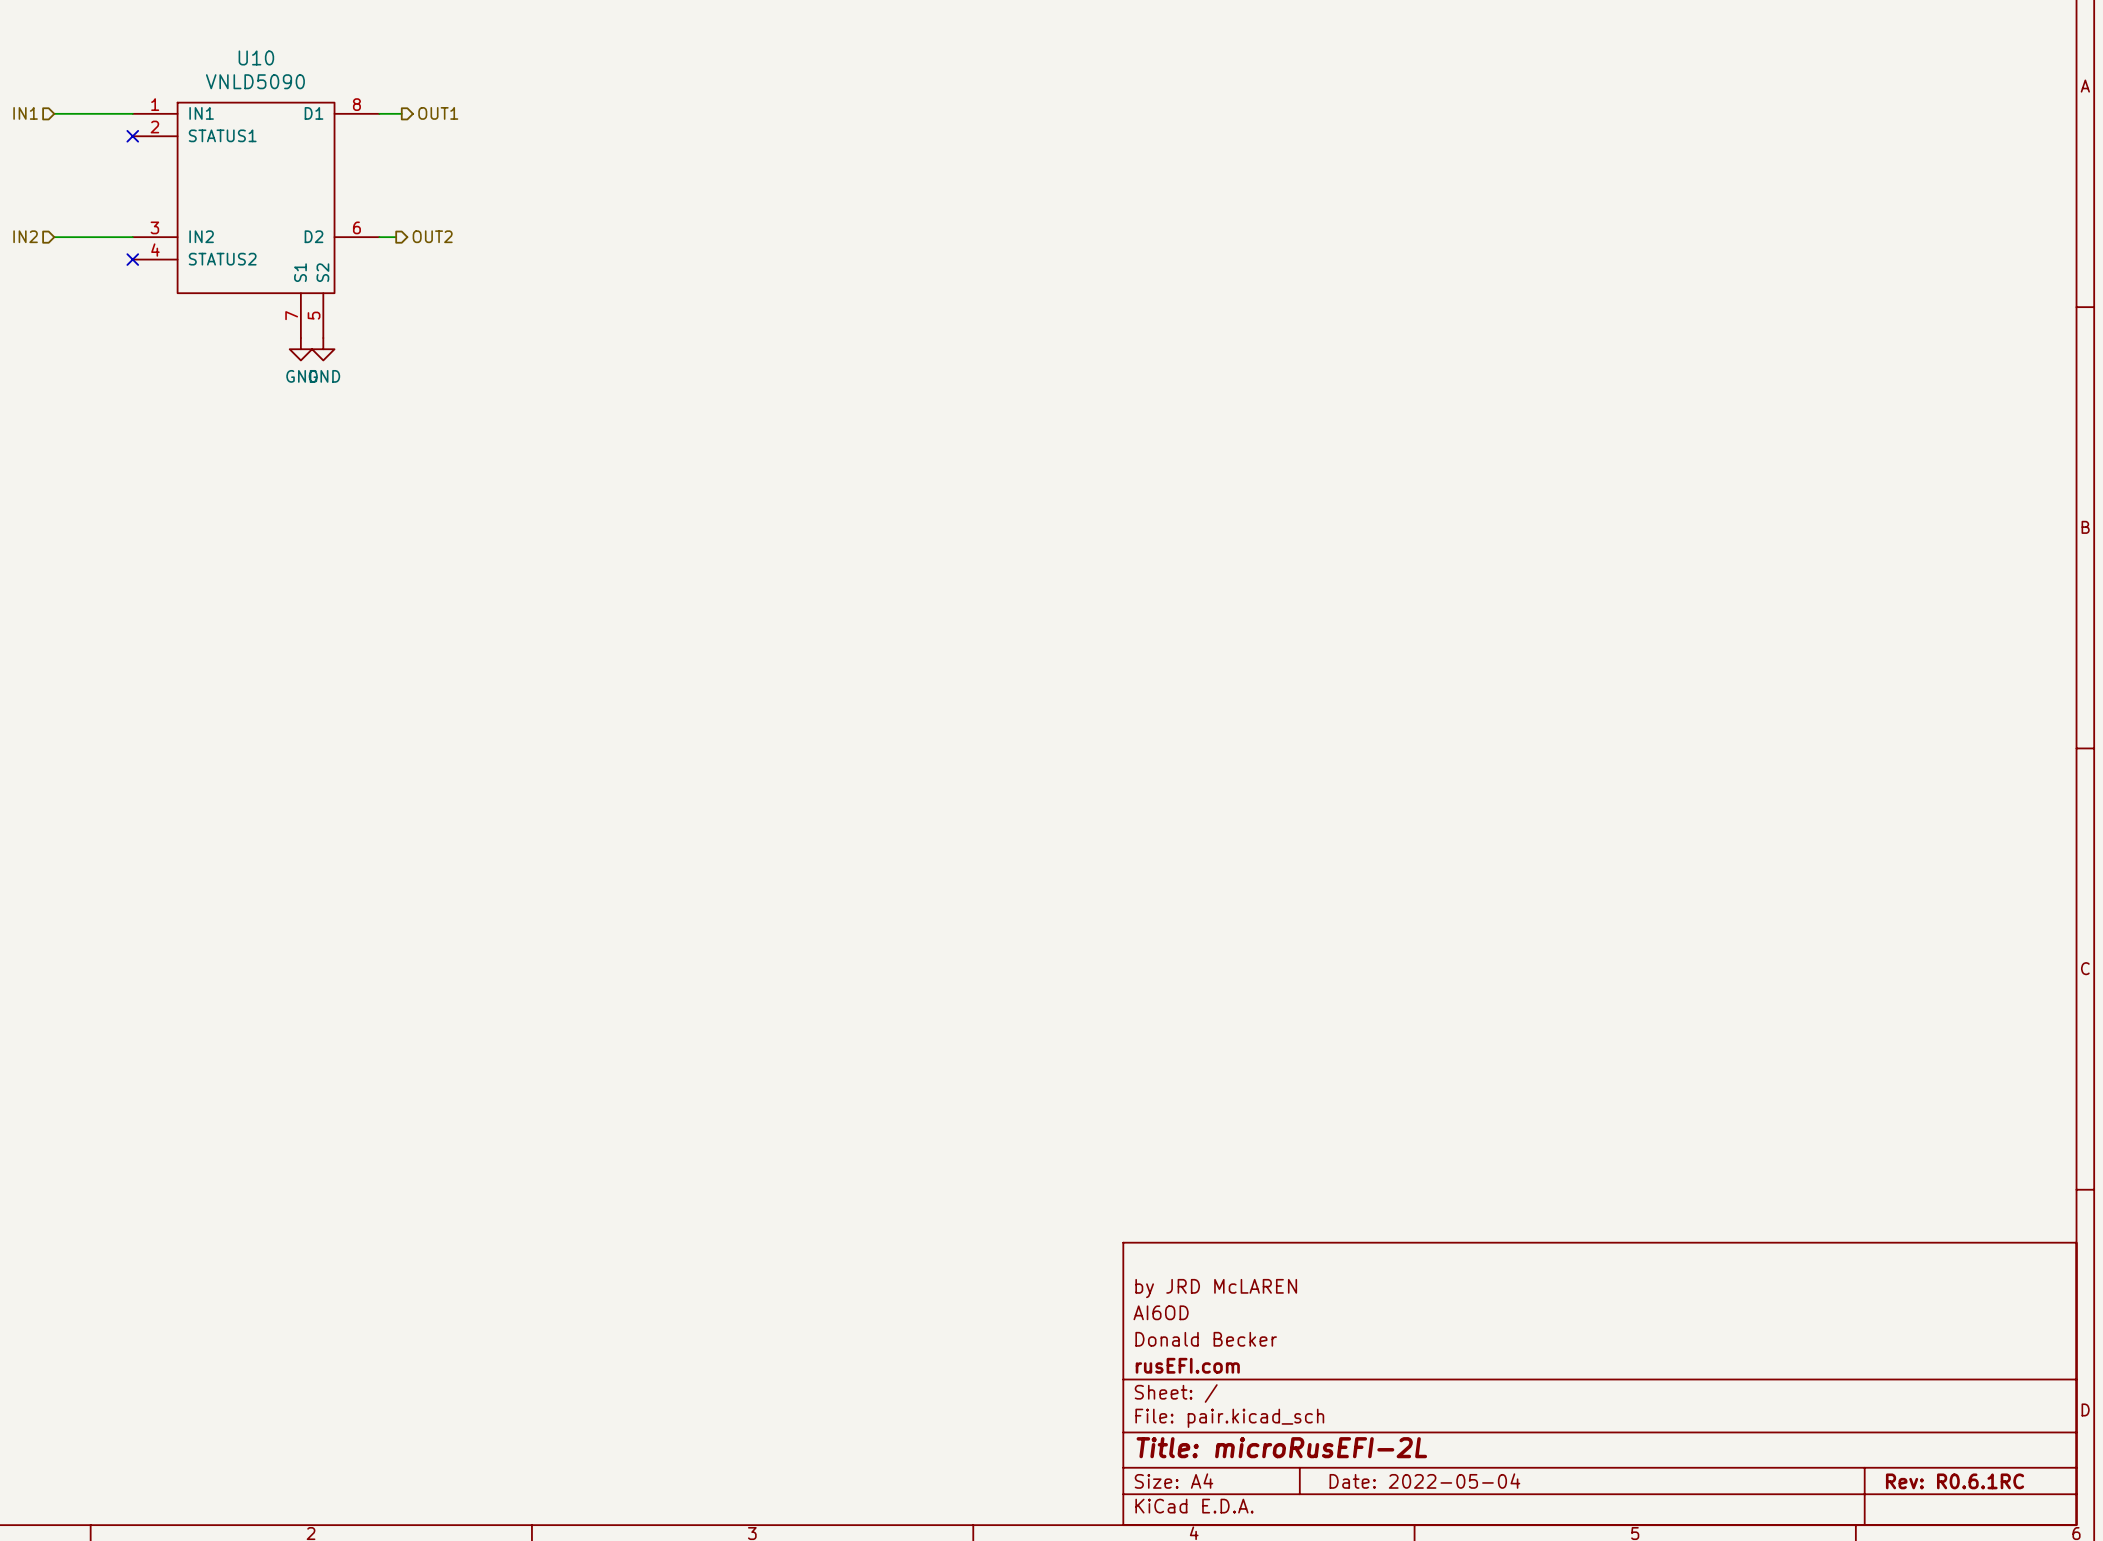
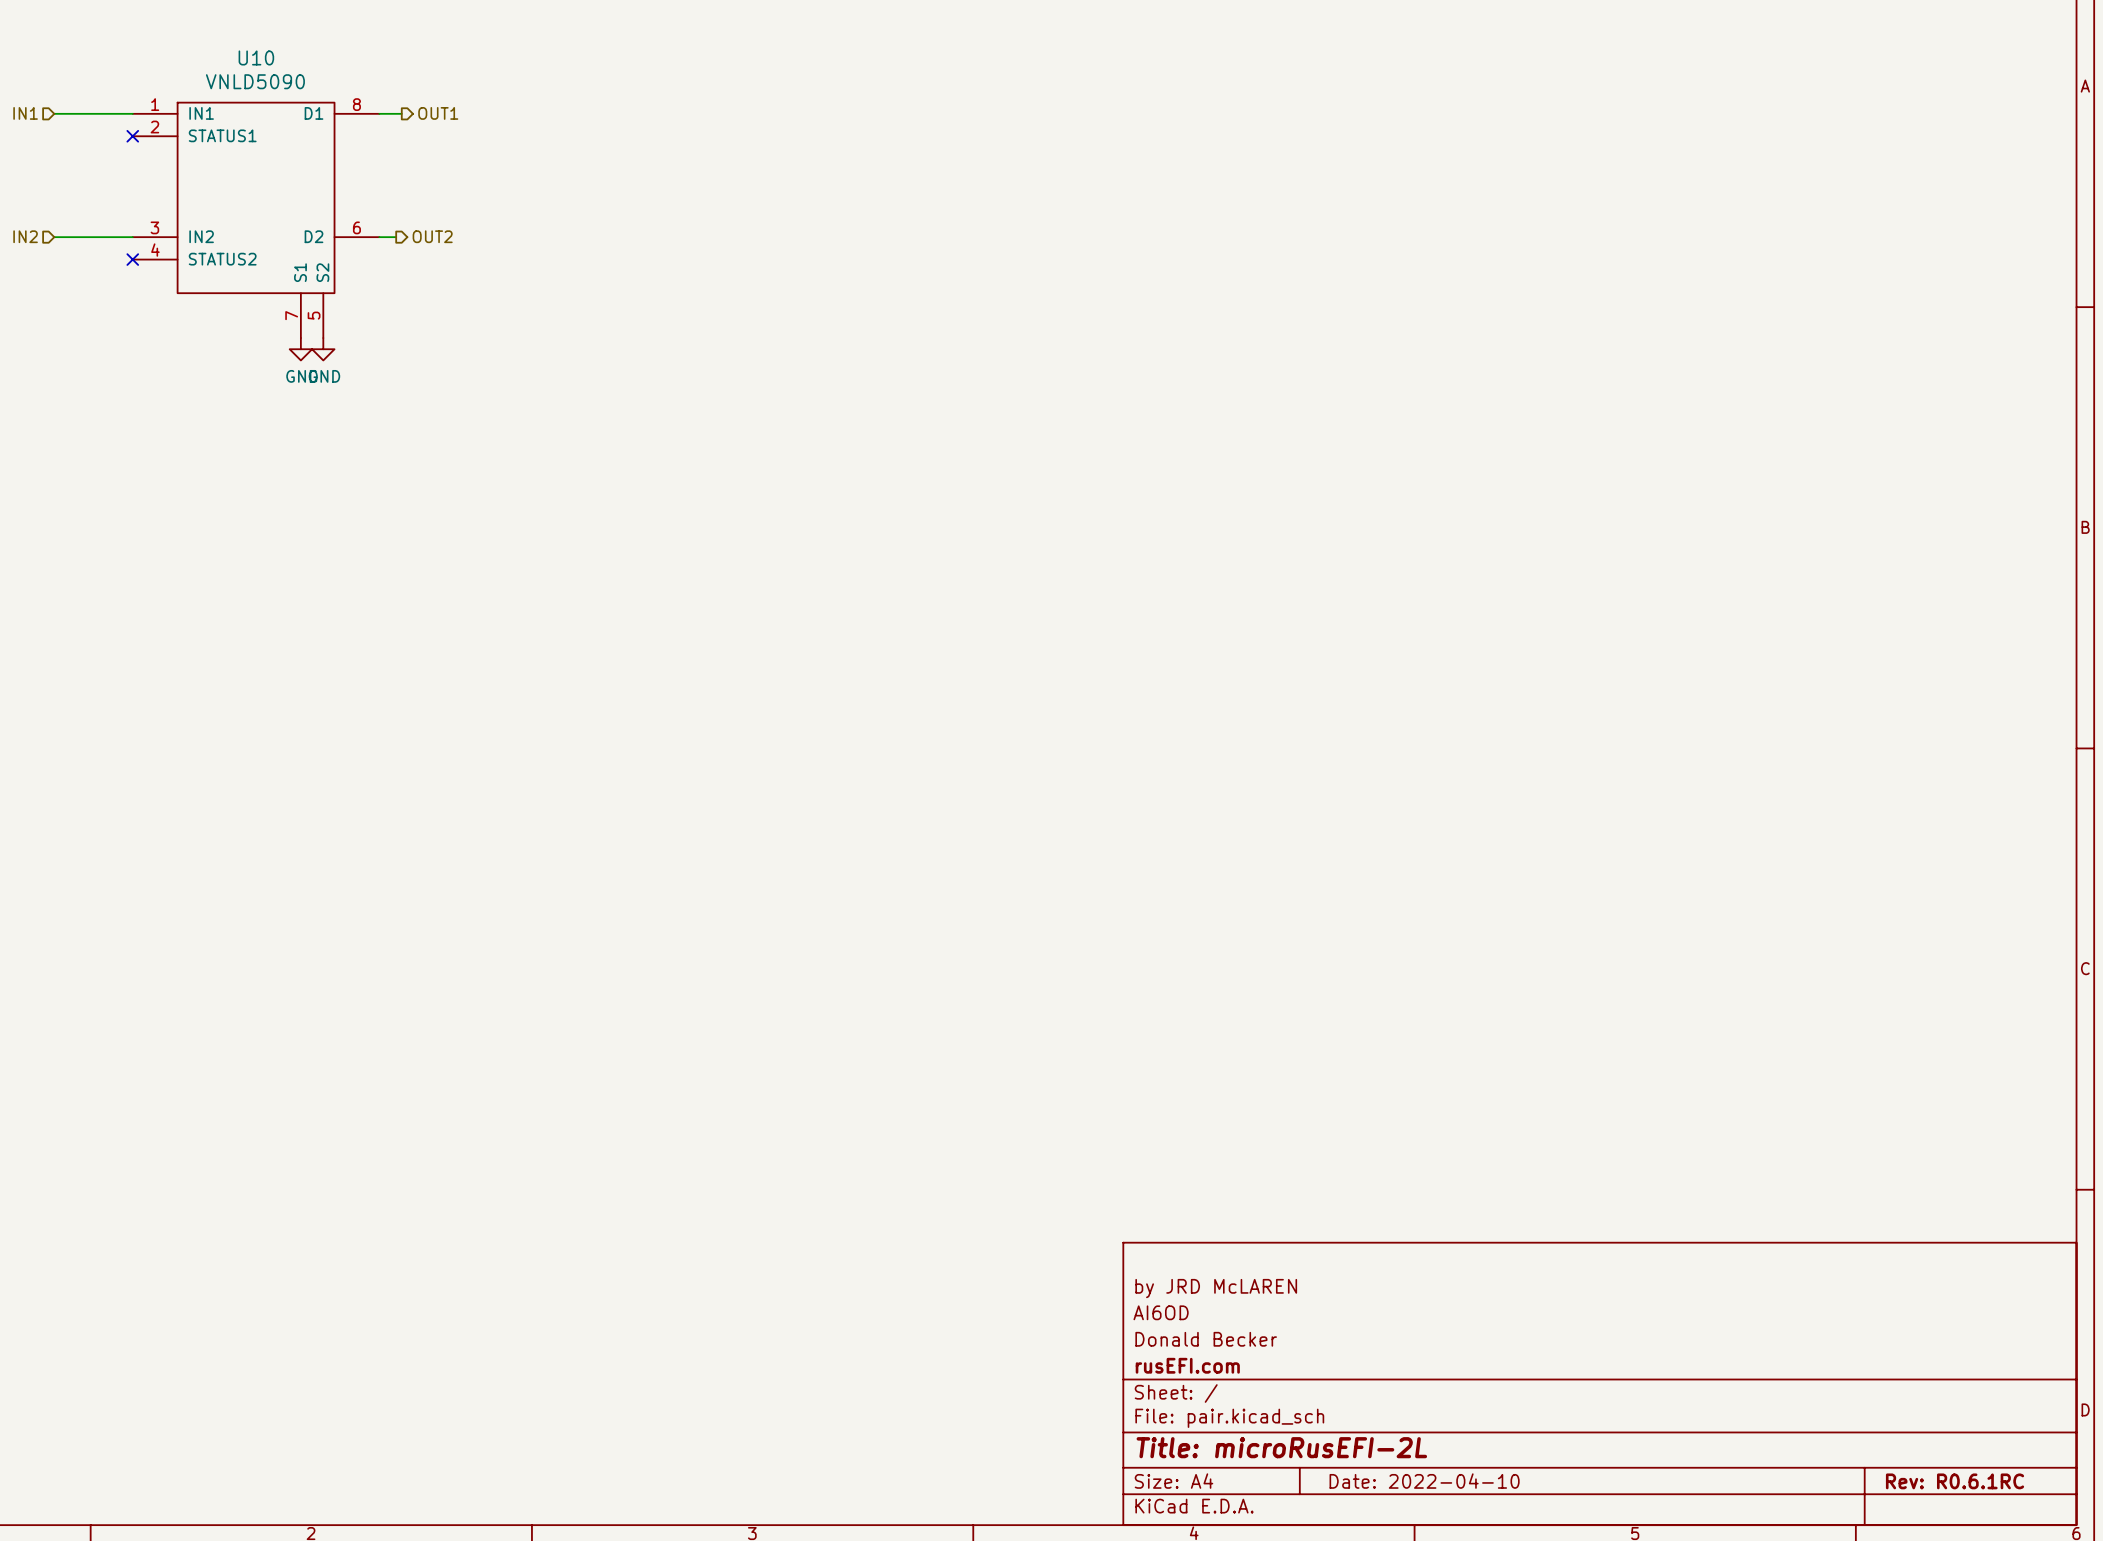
title block: Date: 2022-05-04 (1424, 1481) -> Date: 2022-04-10 (1424, 1481)

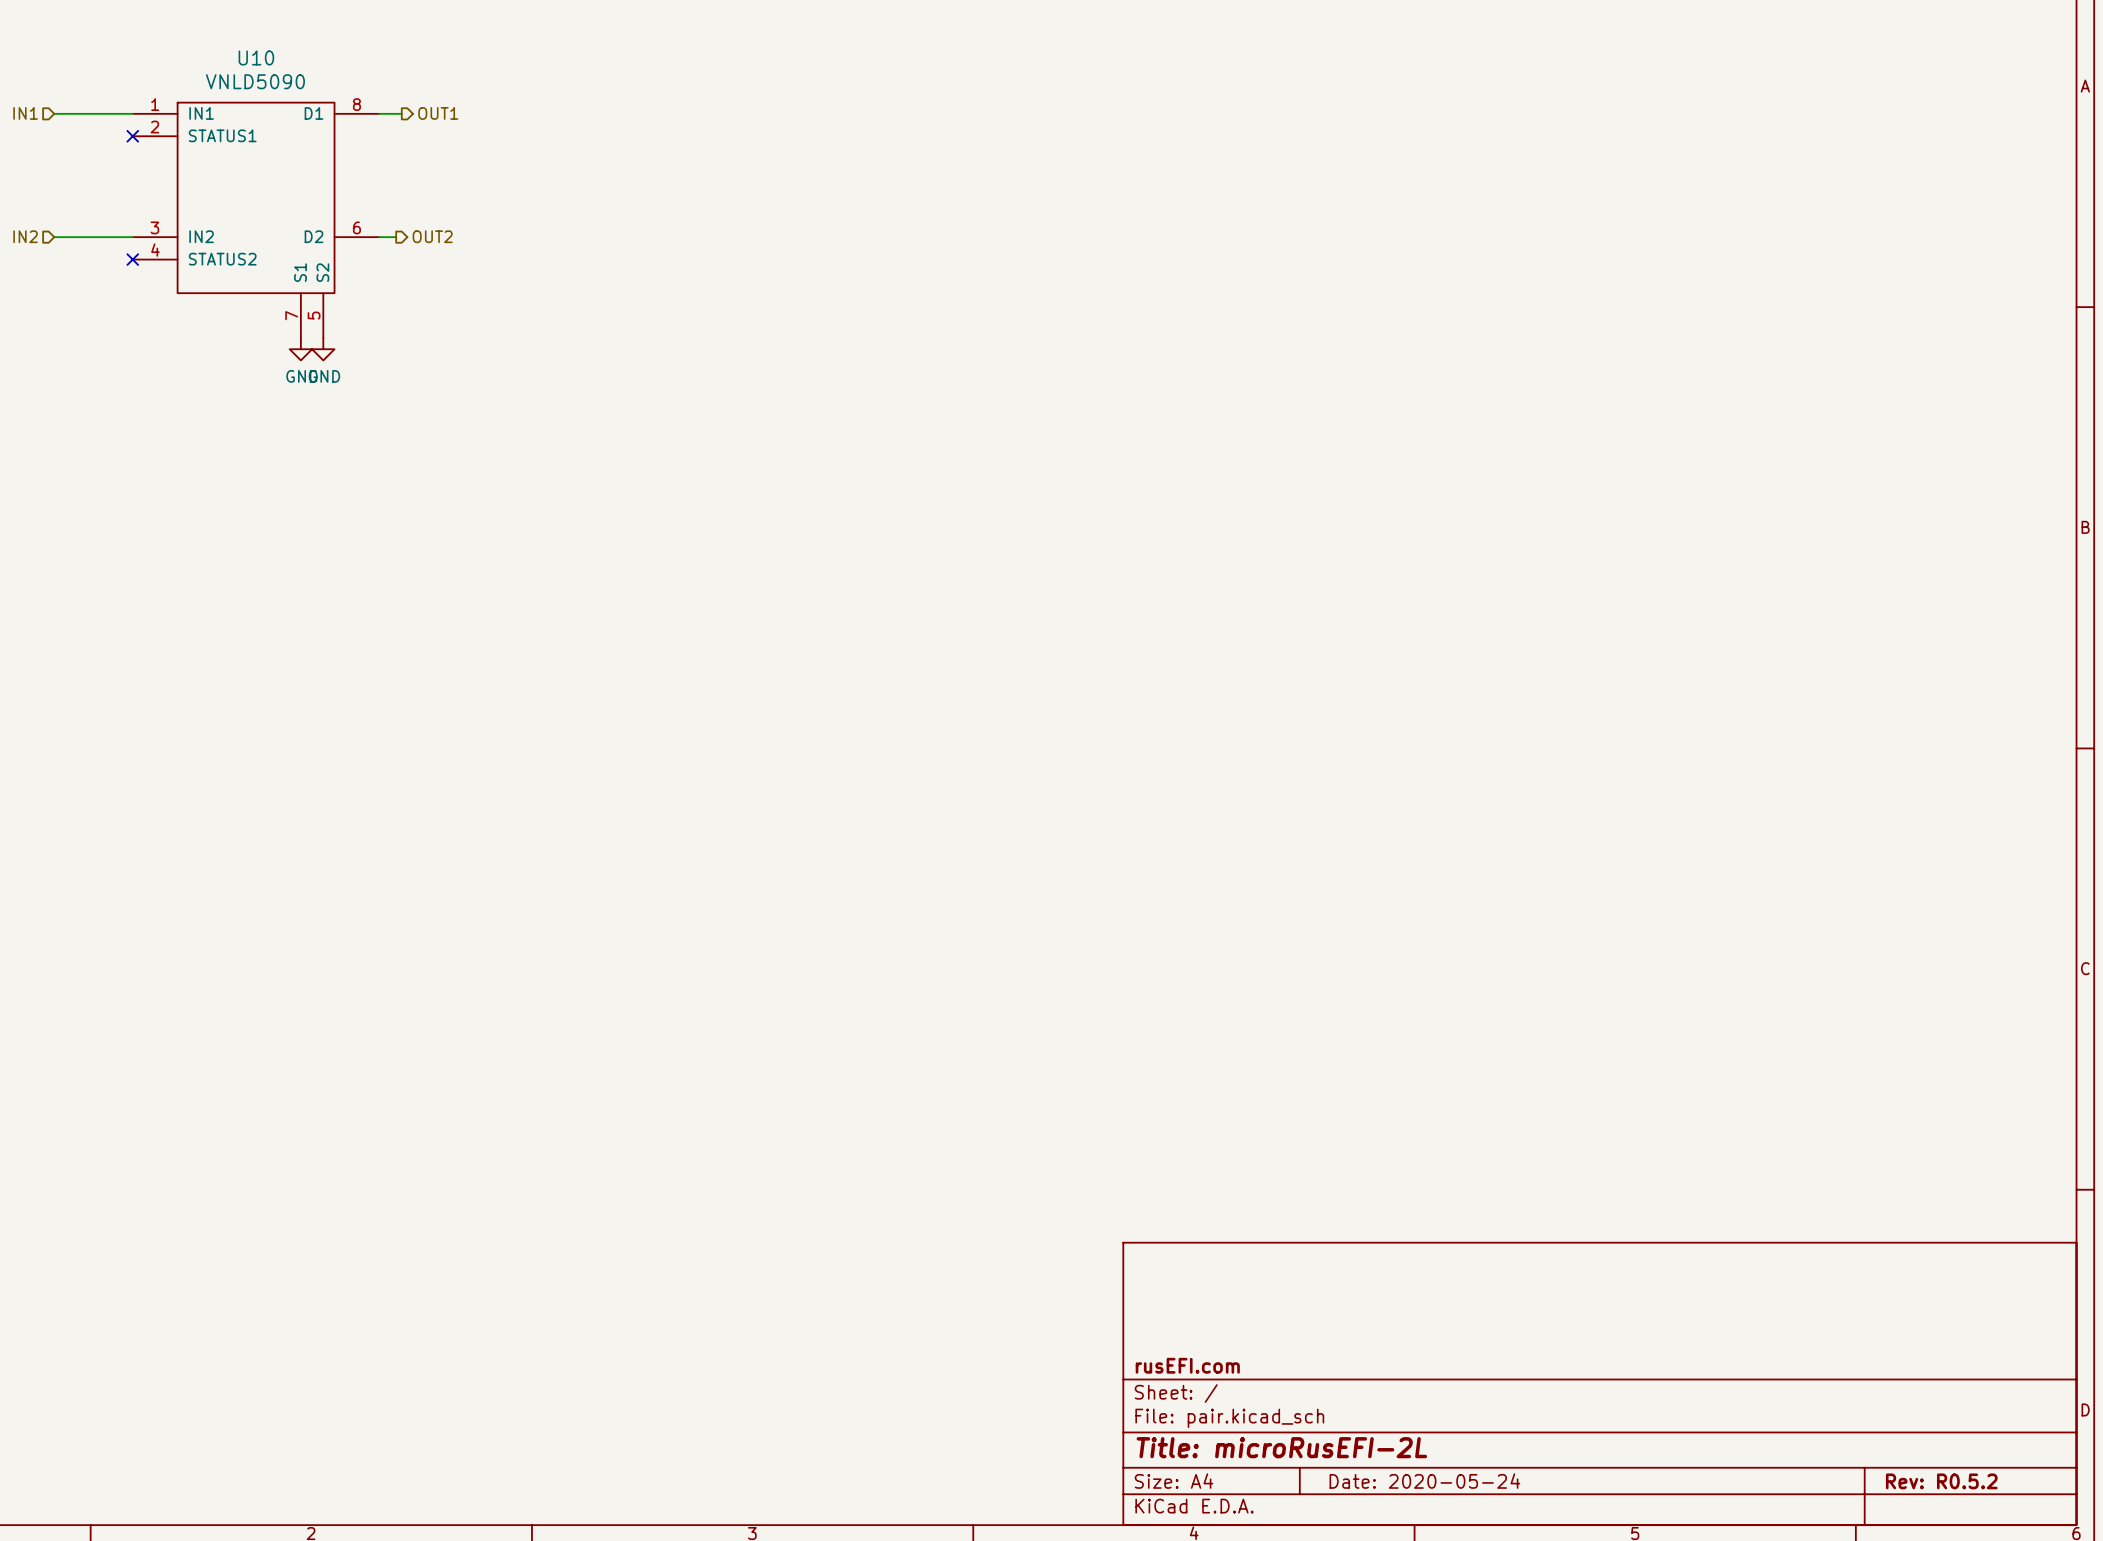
title block: by JRD McLAREN (1216, 1288) -> none
title block: AI6OD (1161, 1312) -> none
title block: Donald Becker (1206, 1339) -> none
title block: Date: 2022-04-10 (1424, 1481) -> Date: 2020-05-24 (1424, 1481)
title block: Rev: R0.6.1RC (1955, 1481) -> Rev: R0.5.2 (1941, 1481)

